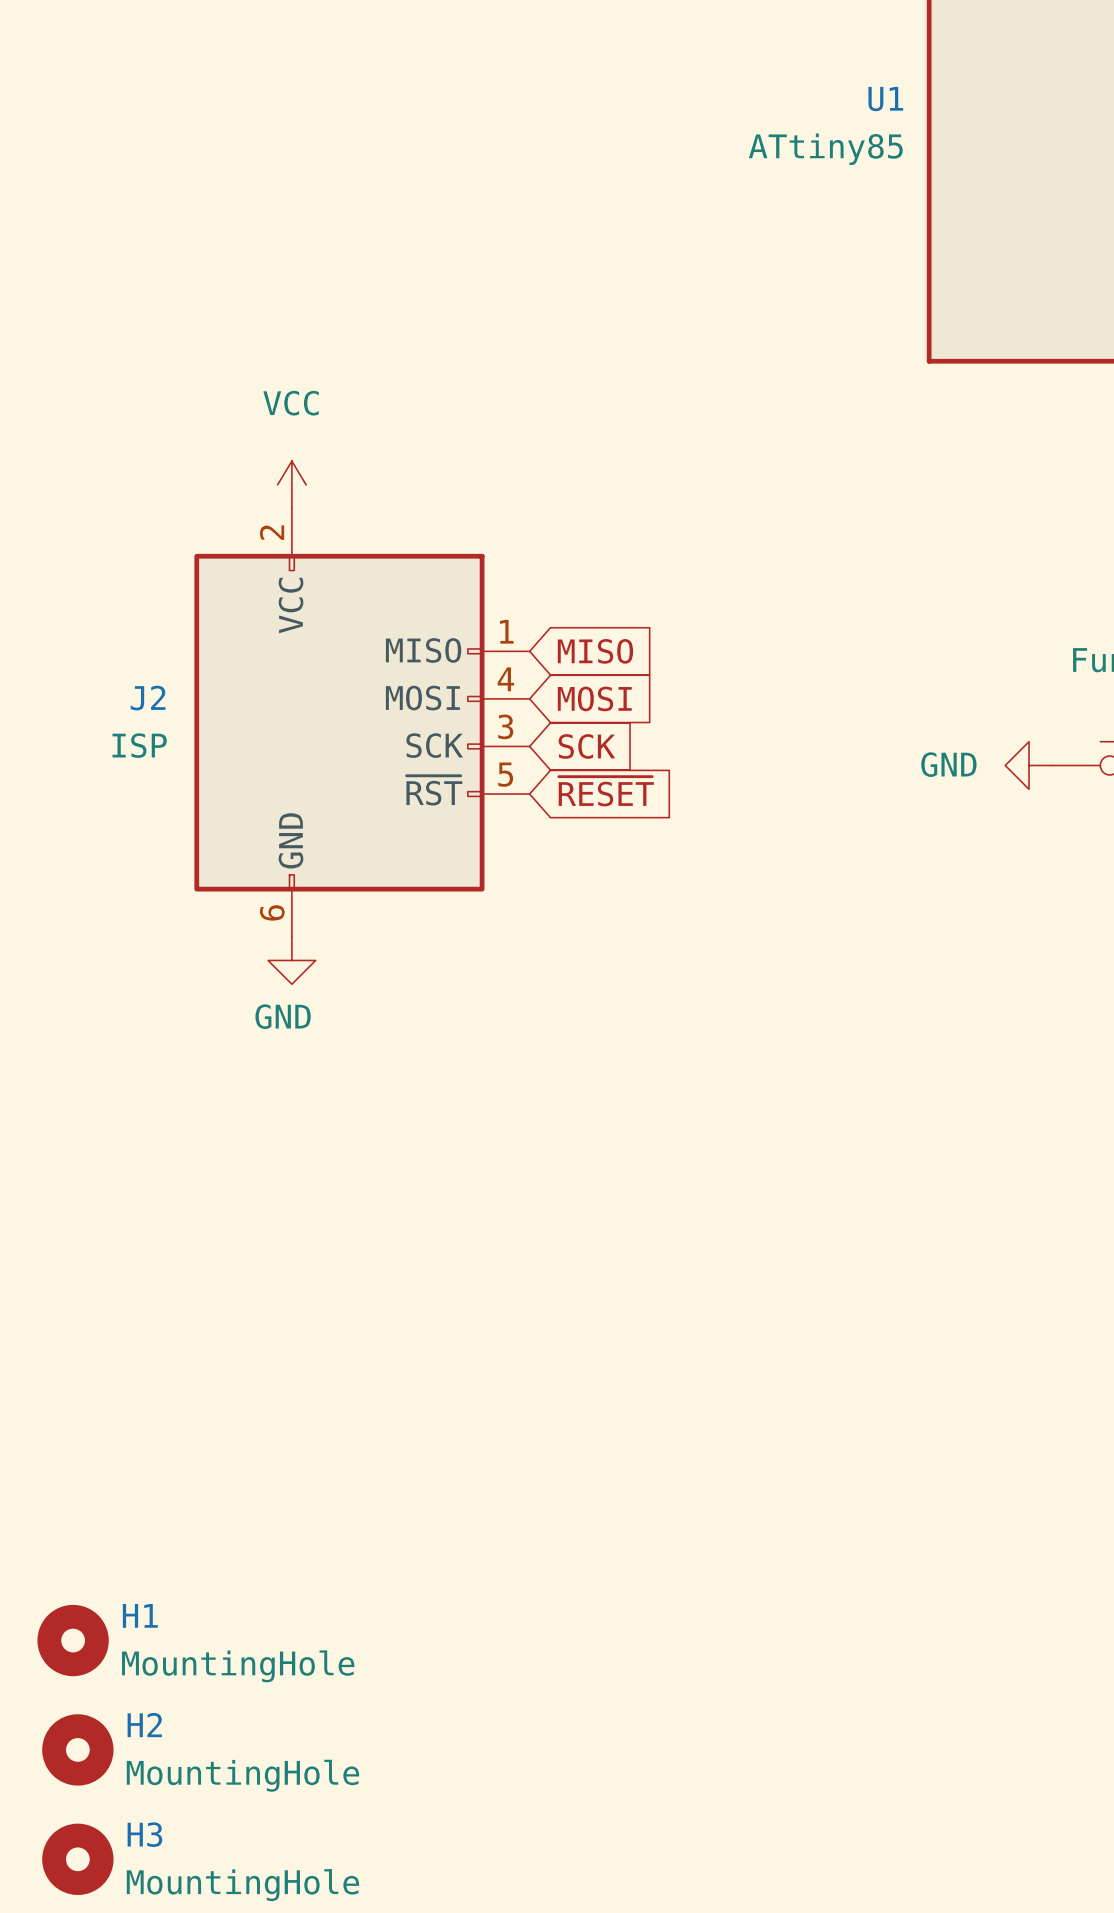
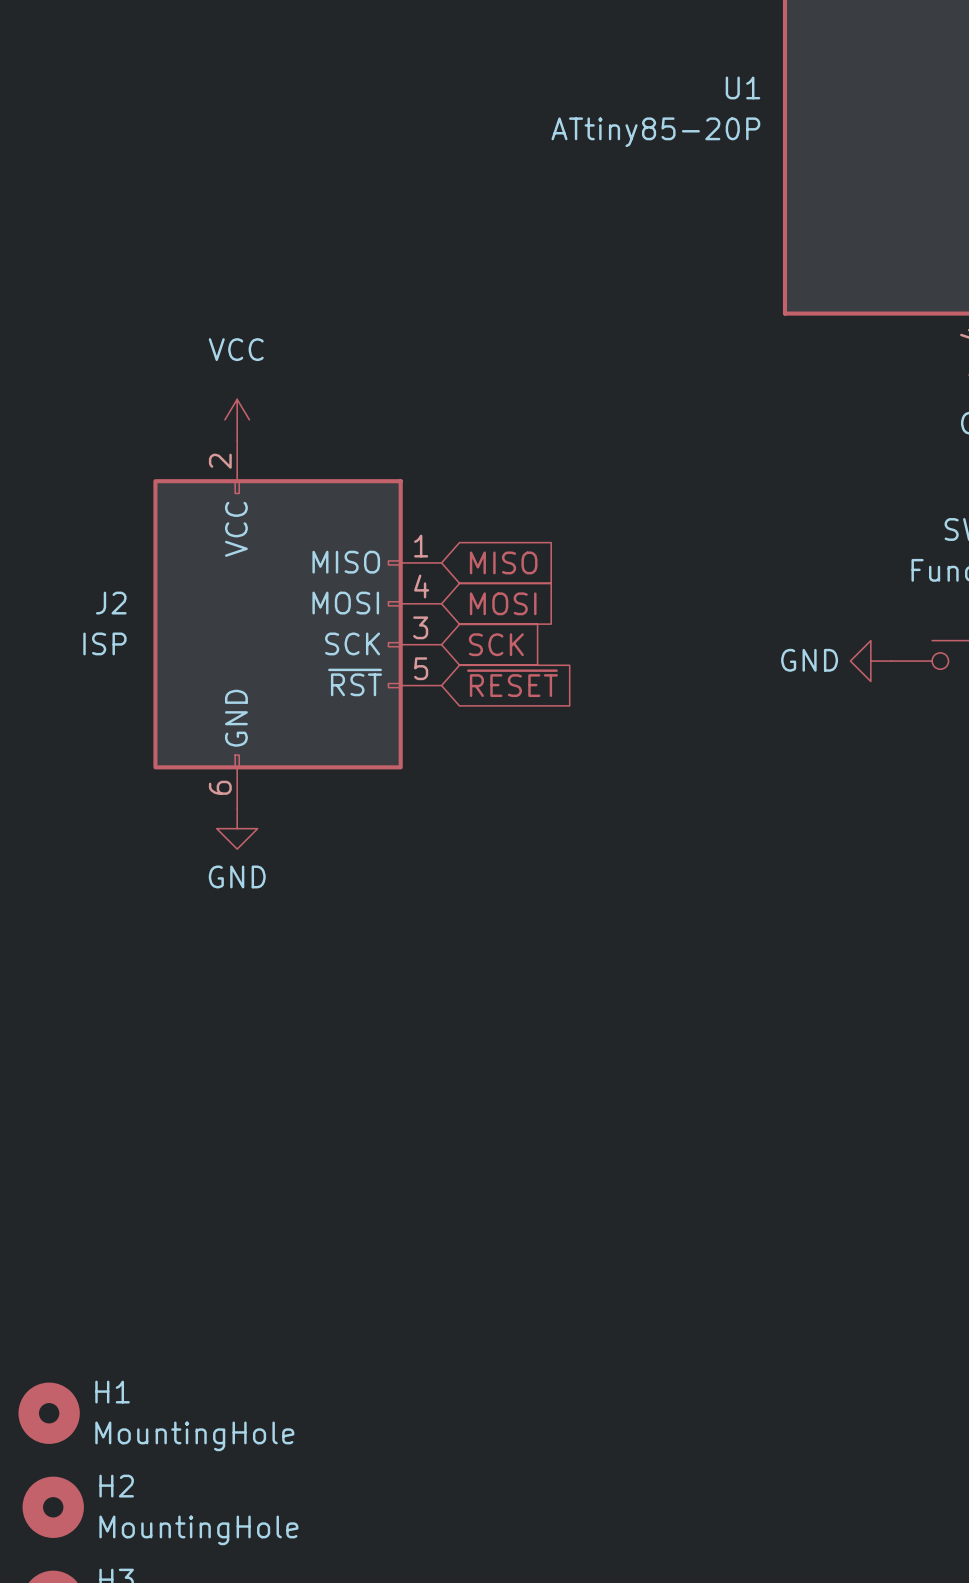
U1 value: ATtiny85 (825, 149) -> ATtiny85-20P (655, 132)

